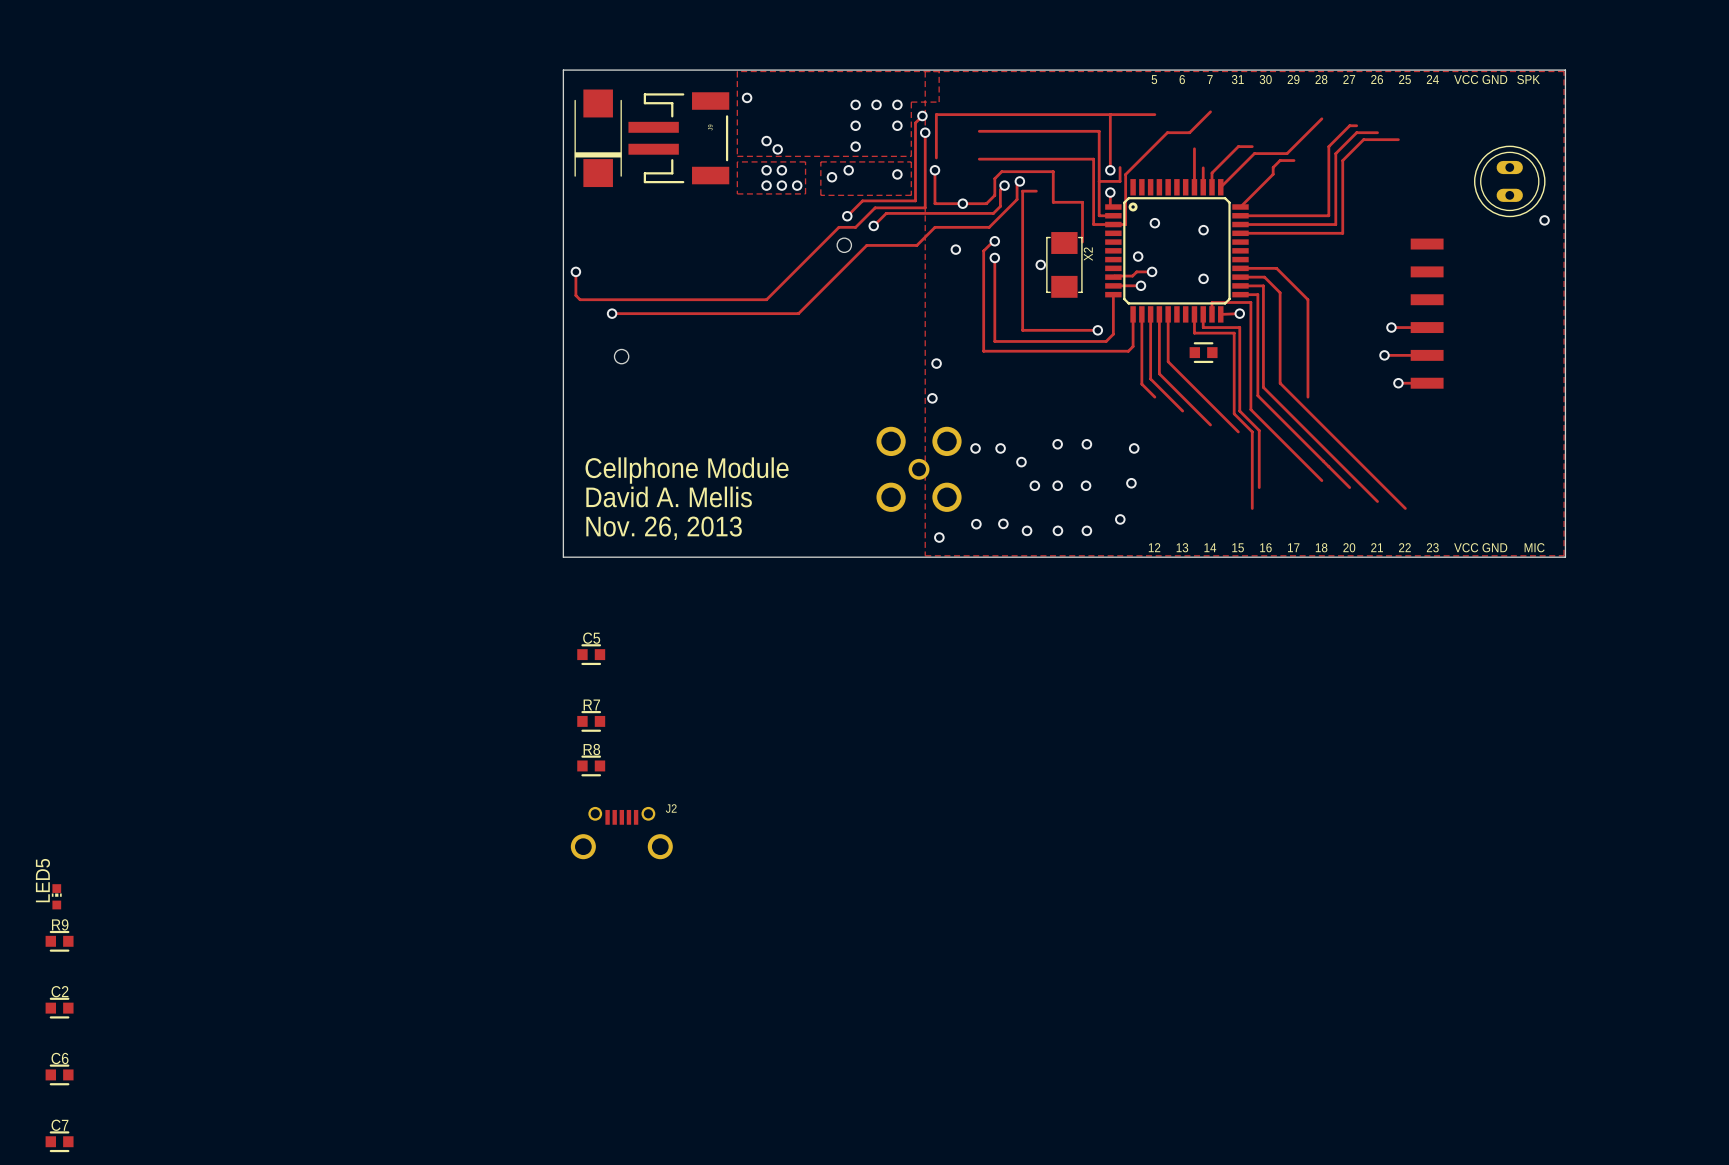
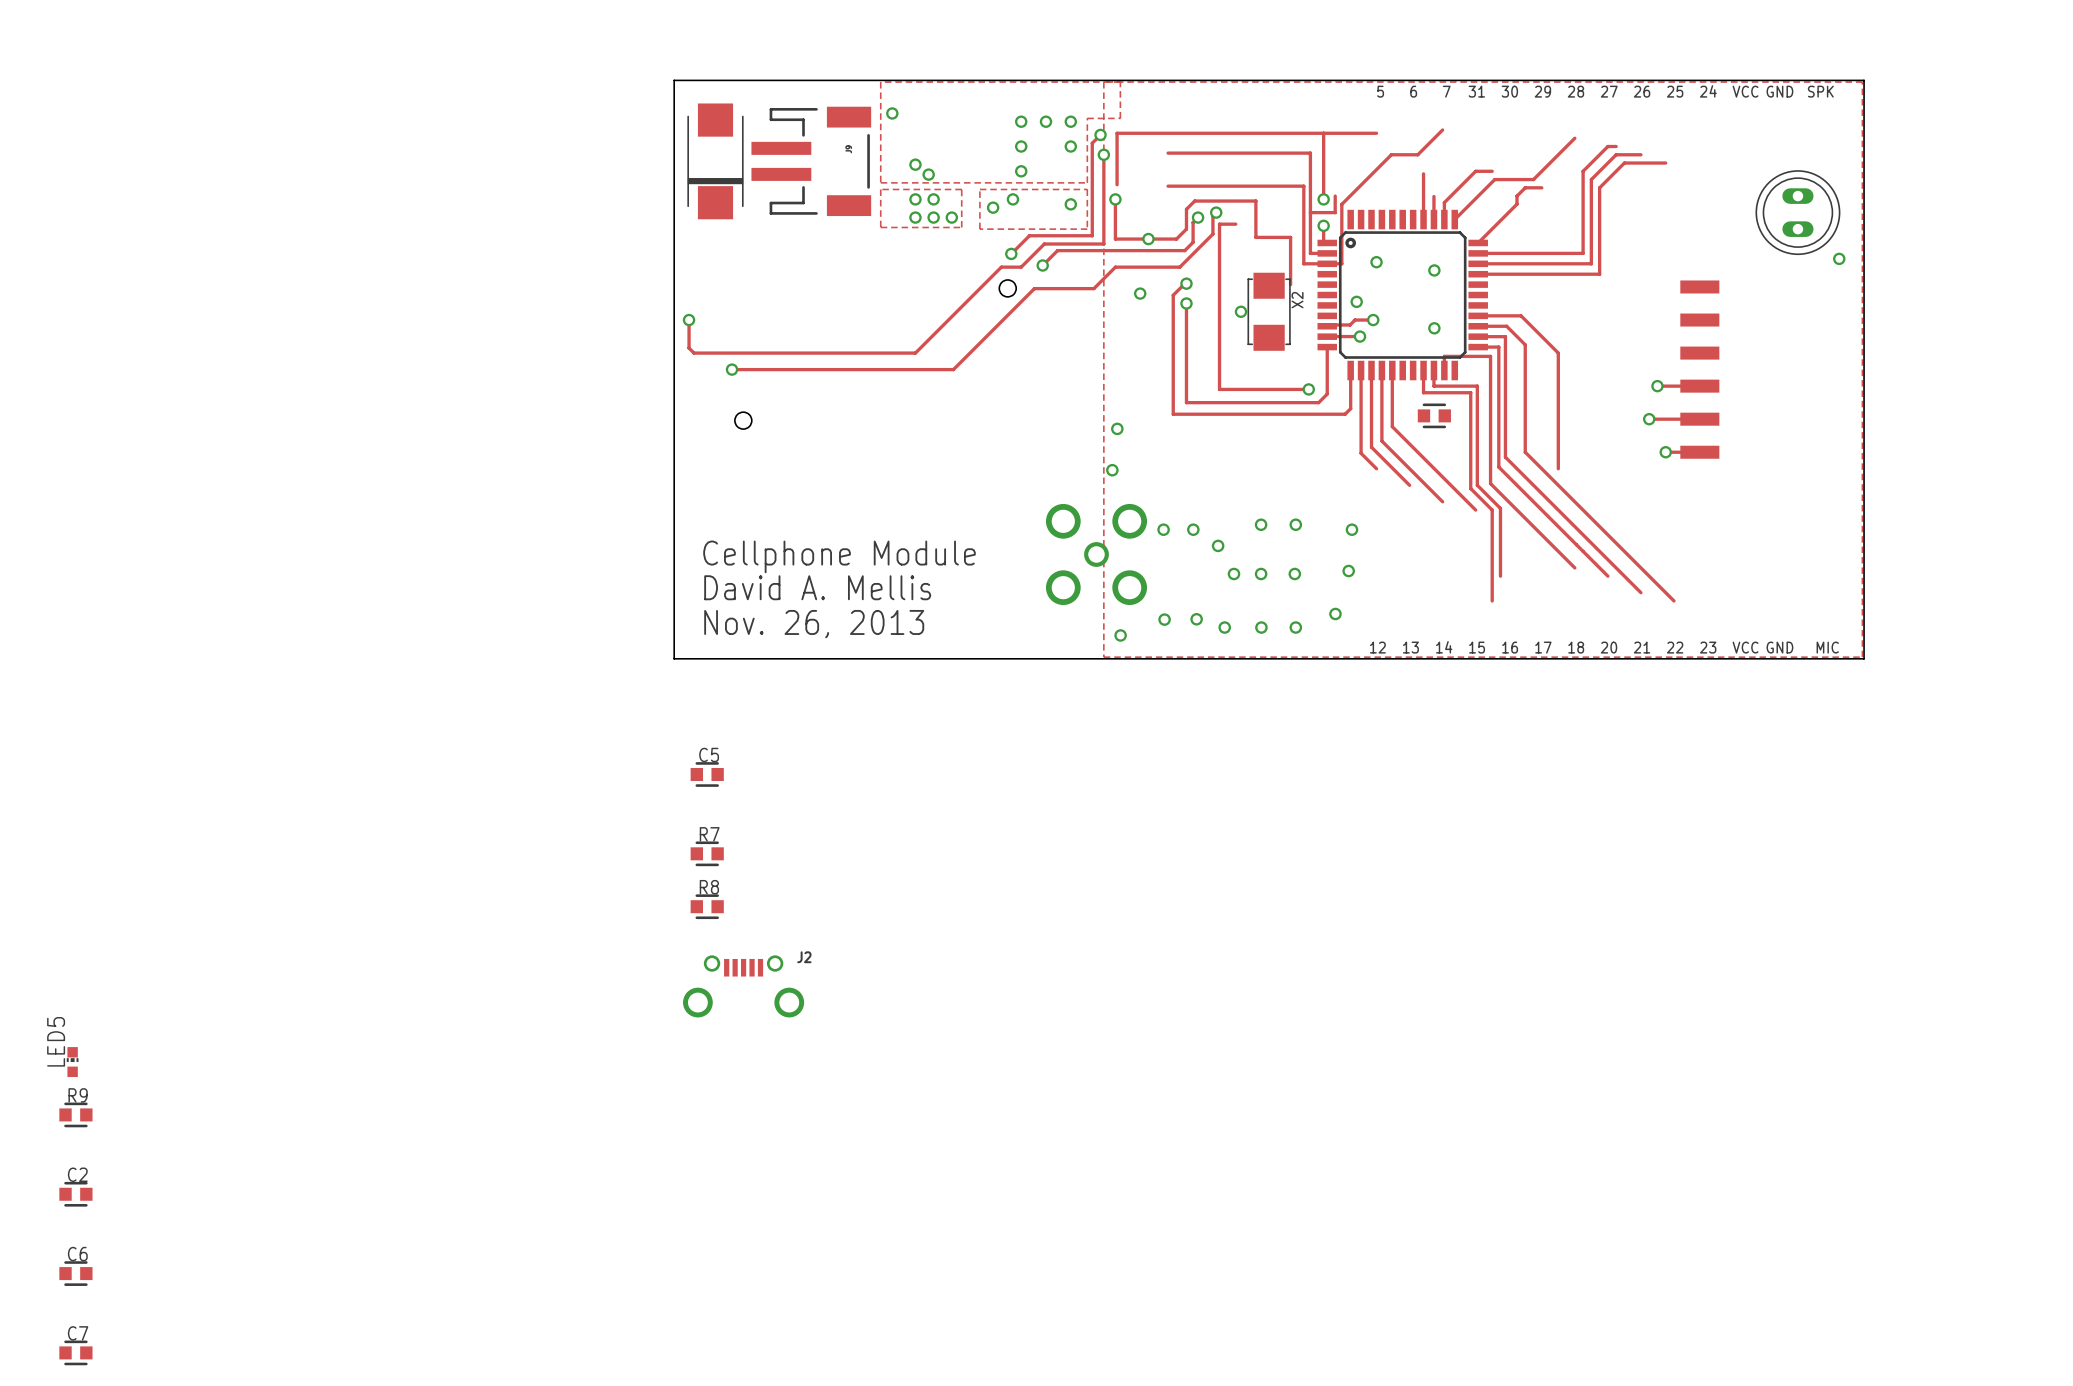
track: (1239, 313) (1220, 314) -> none
via: (1239, 313) -> none

